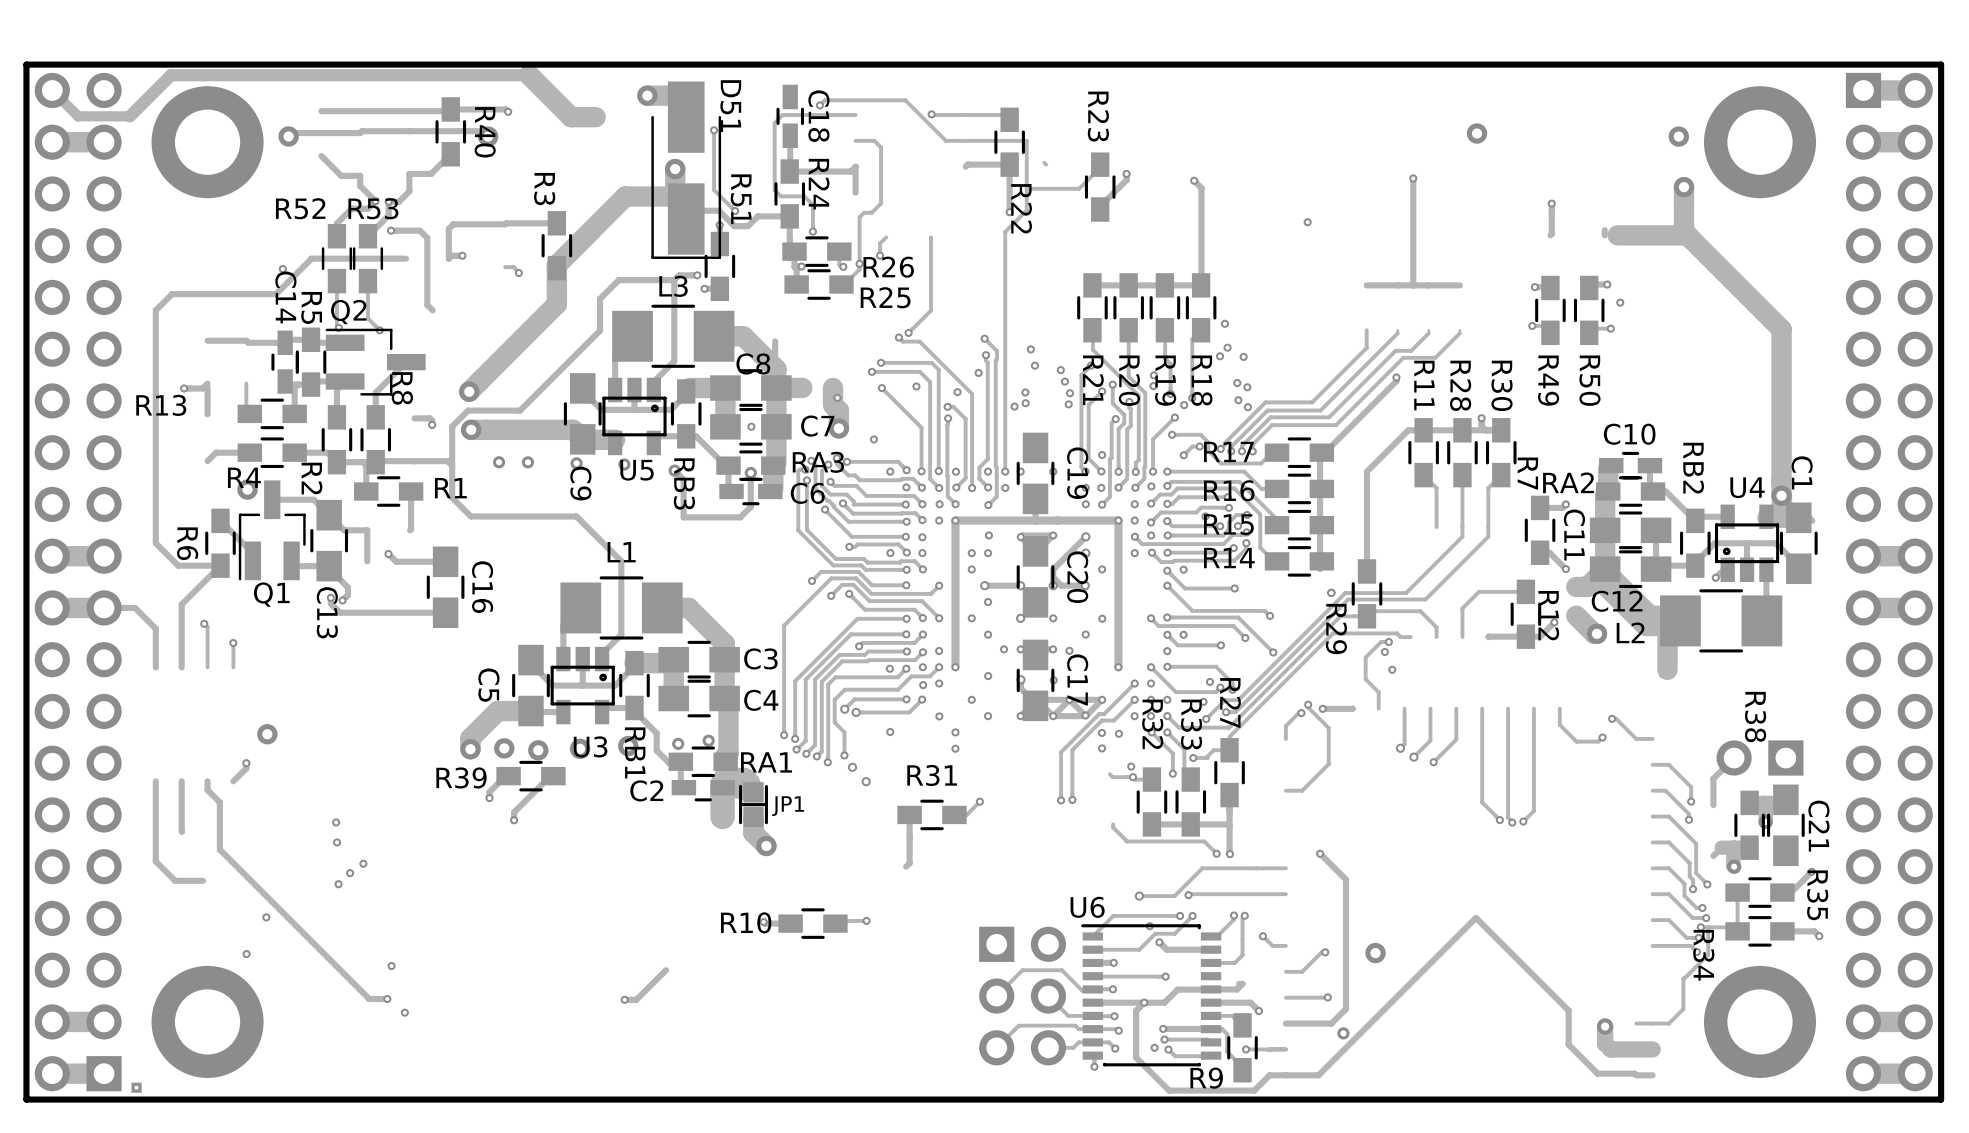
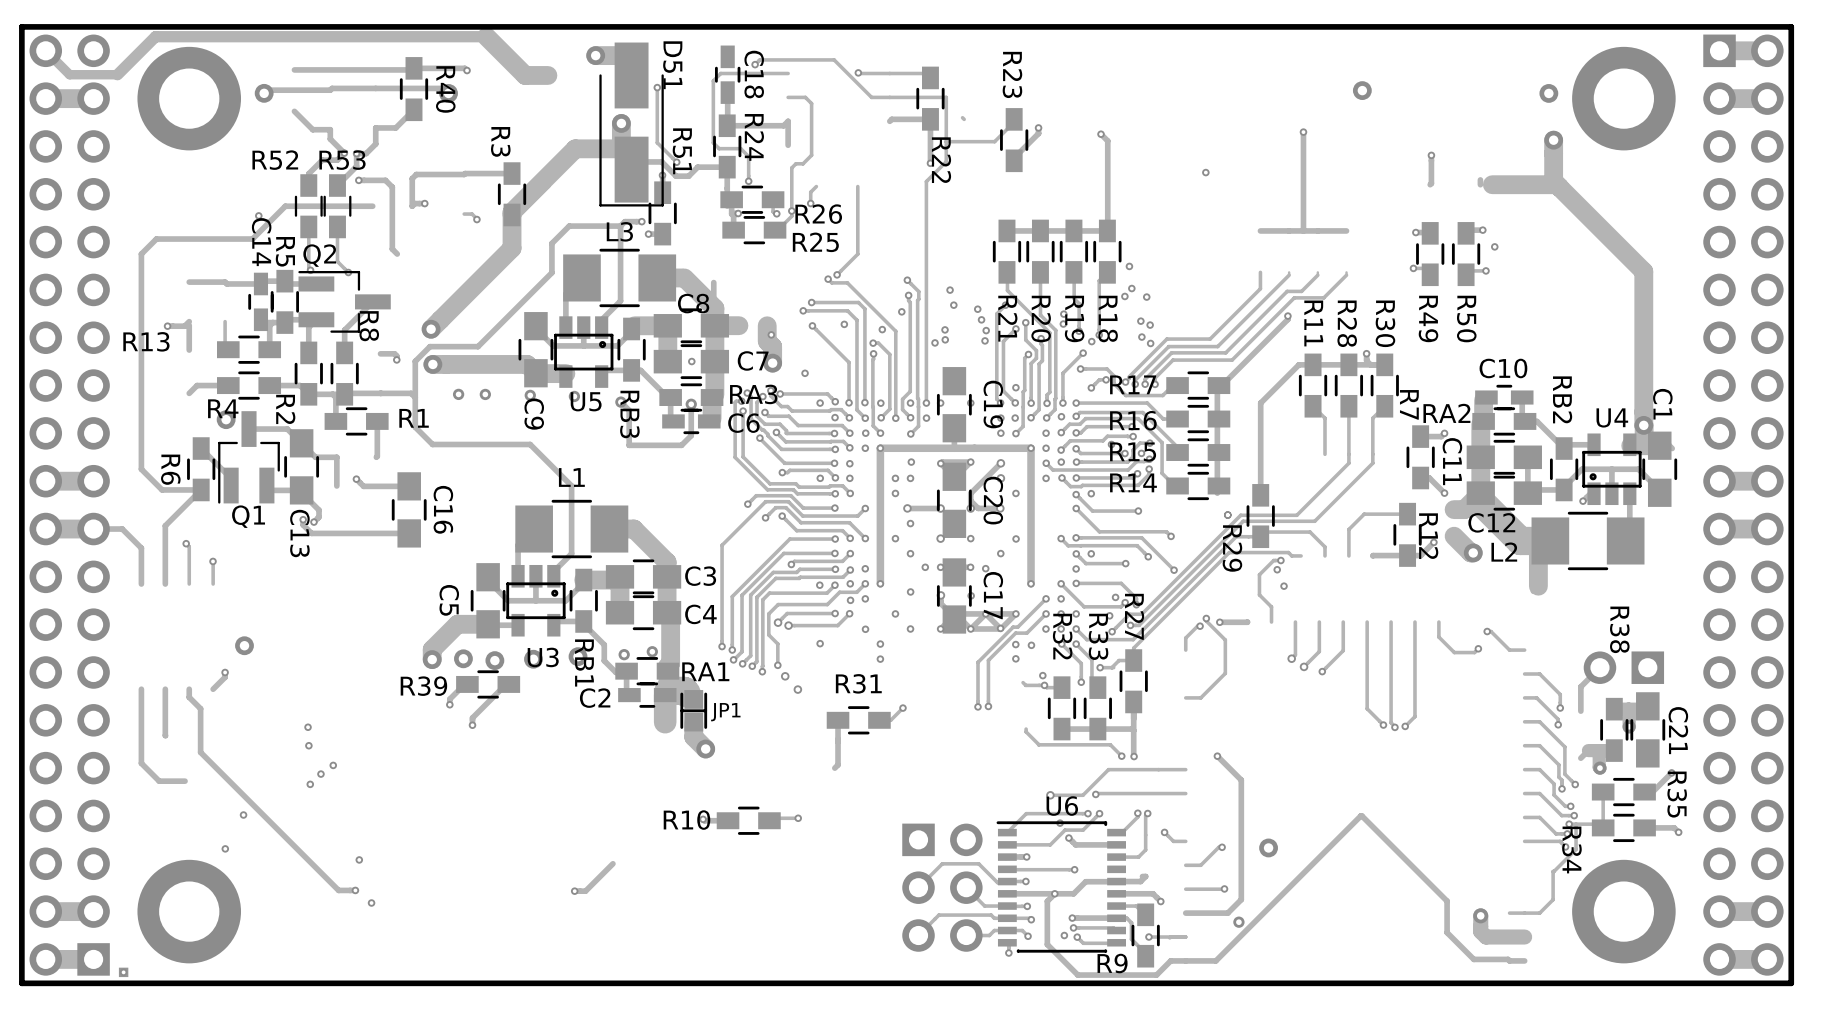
U6 name position: U6 (1087, 907) -> U6 (1062, 806)

